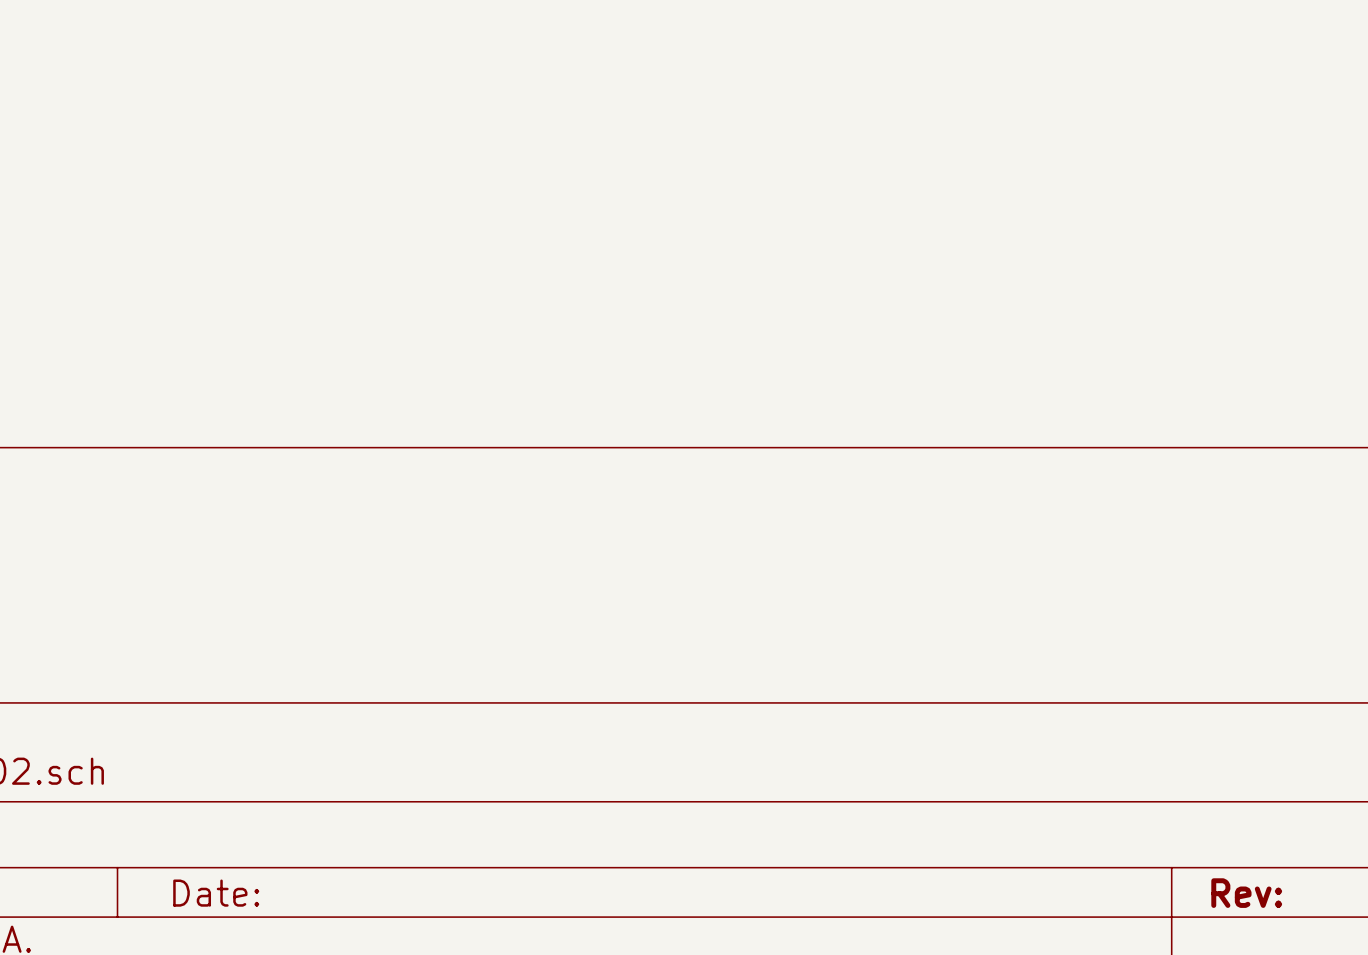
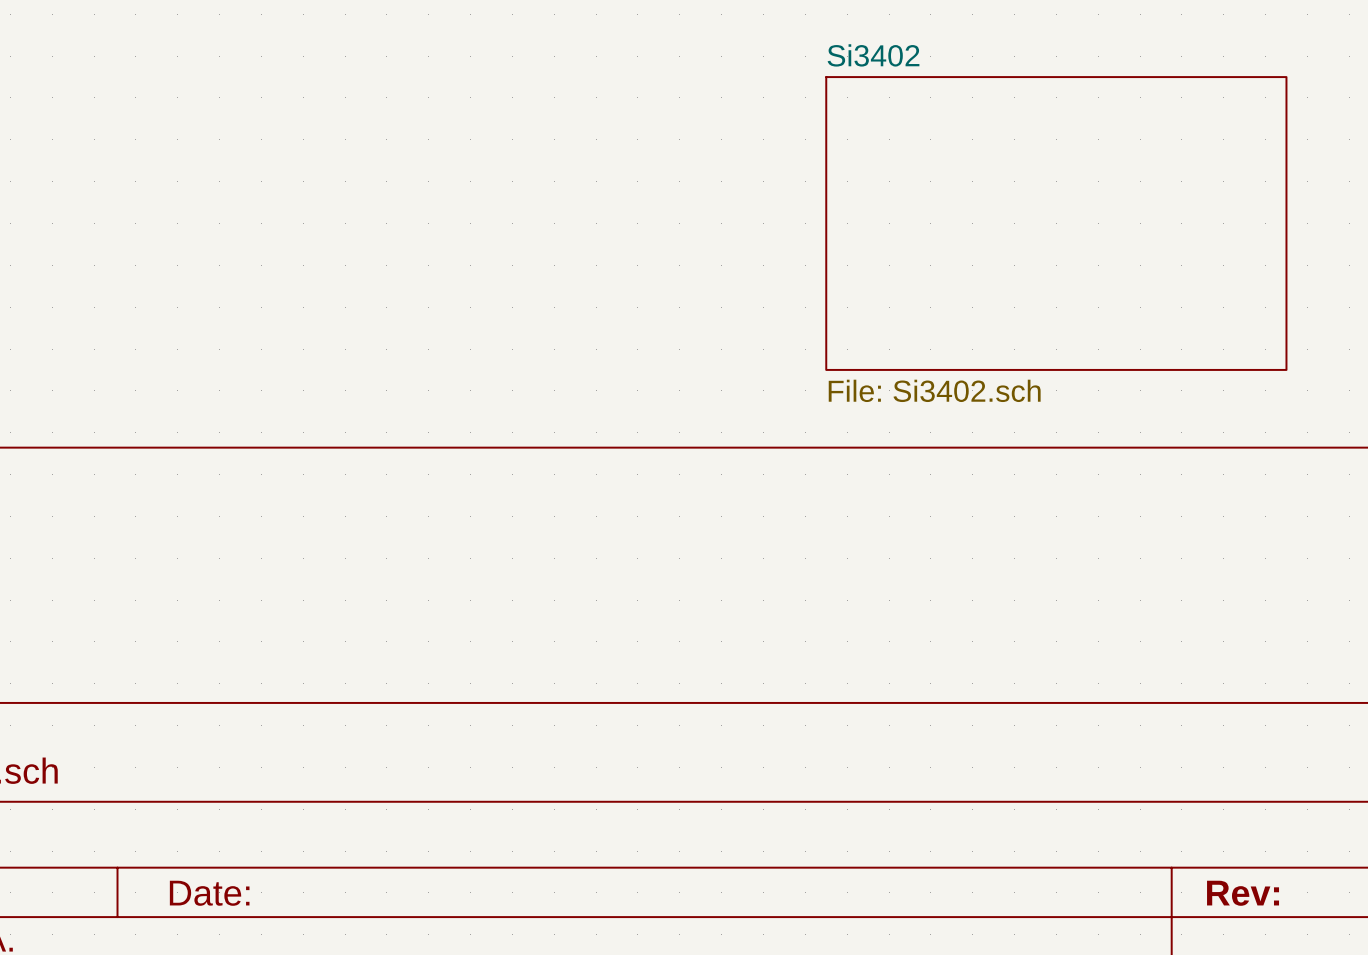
sheet Si3402: none -> File: Si3402.sch (1056, 223)

